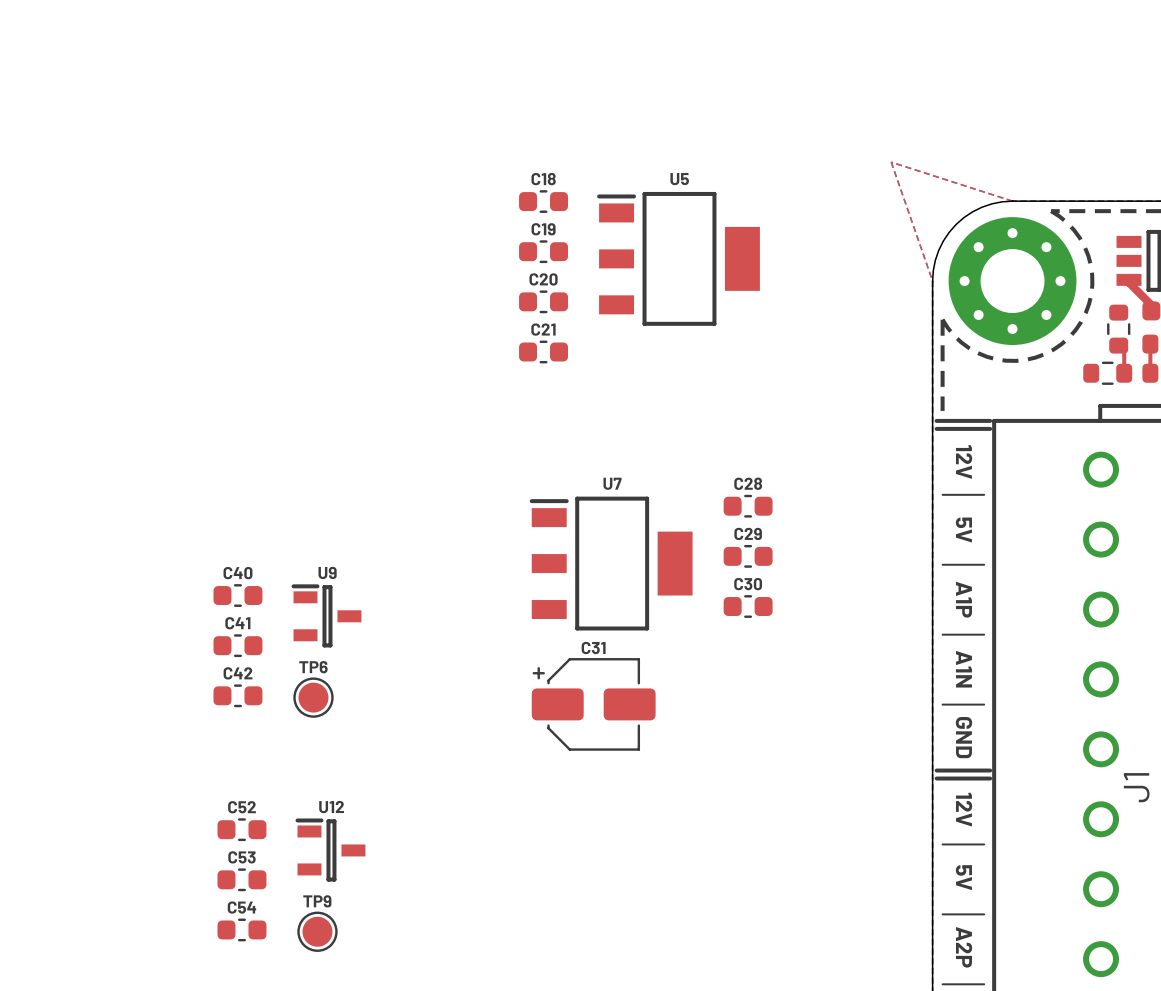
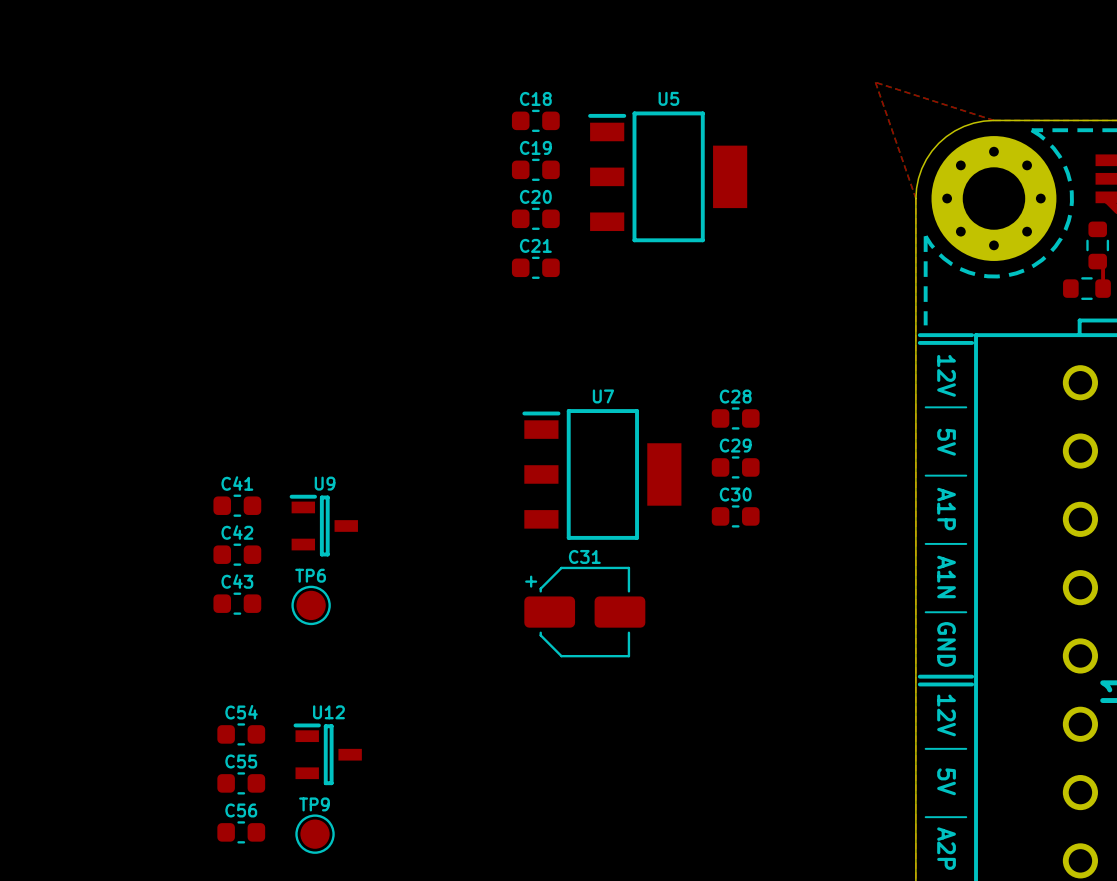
C40 name: C40 (237, 573) -> C41 (237, 483)
C41 name: C41 (237, 623) -> C42 (237, 532)
C42 name: C42 (238, 673) -> C43 (237, 581)
C52 name: C52 (242, 807) -> C54 (241, 712)
C53 name: C53 (242, 857) -> C55 (241, 761)
C54 name: C54 (241, 907) -> C56 (241, 810)

